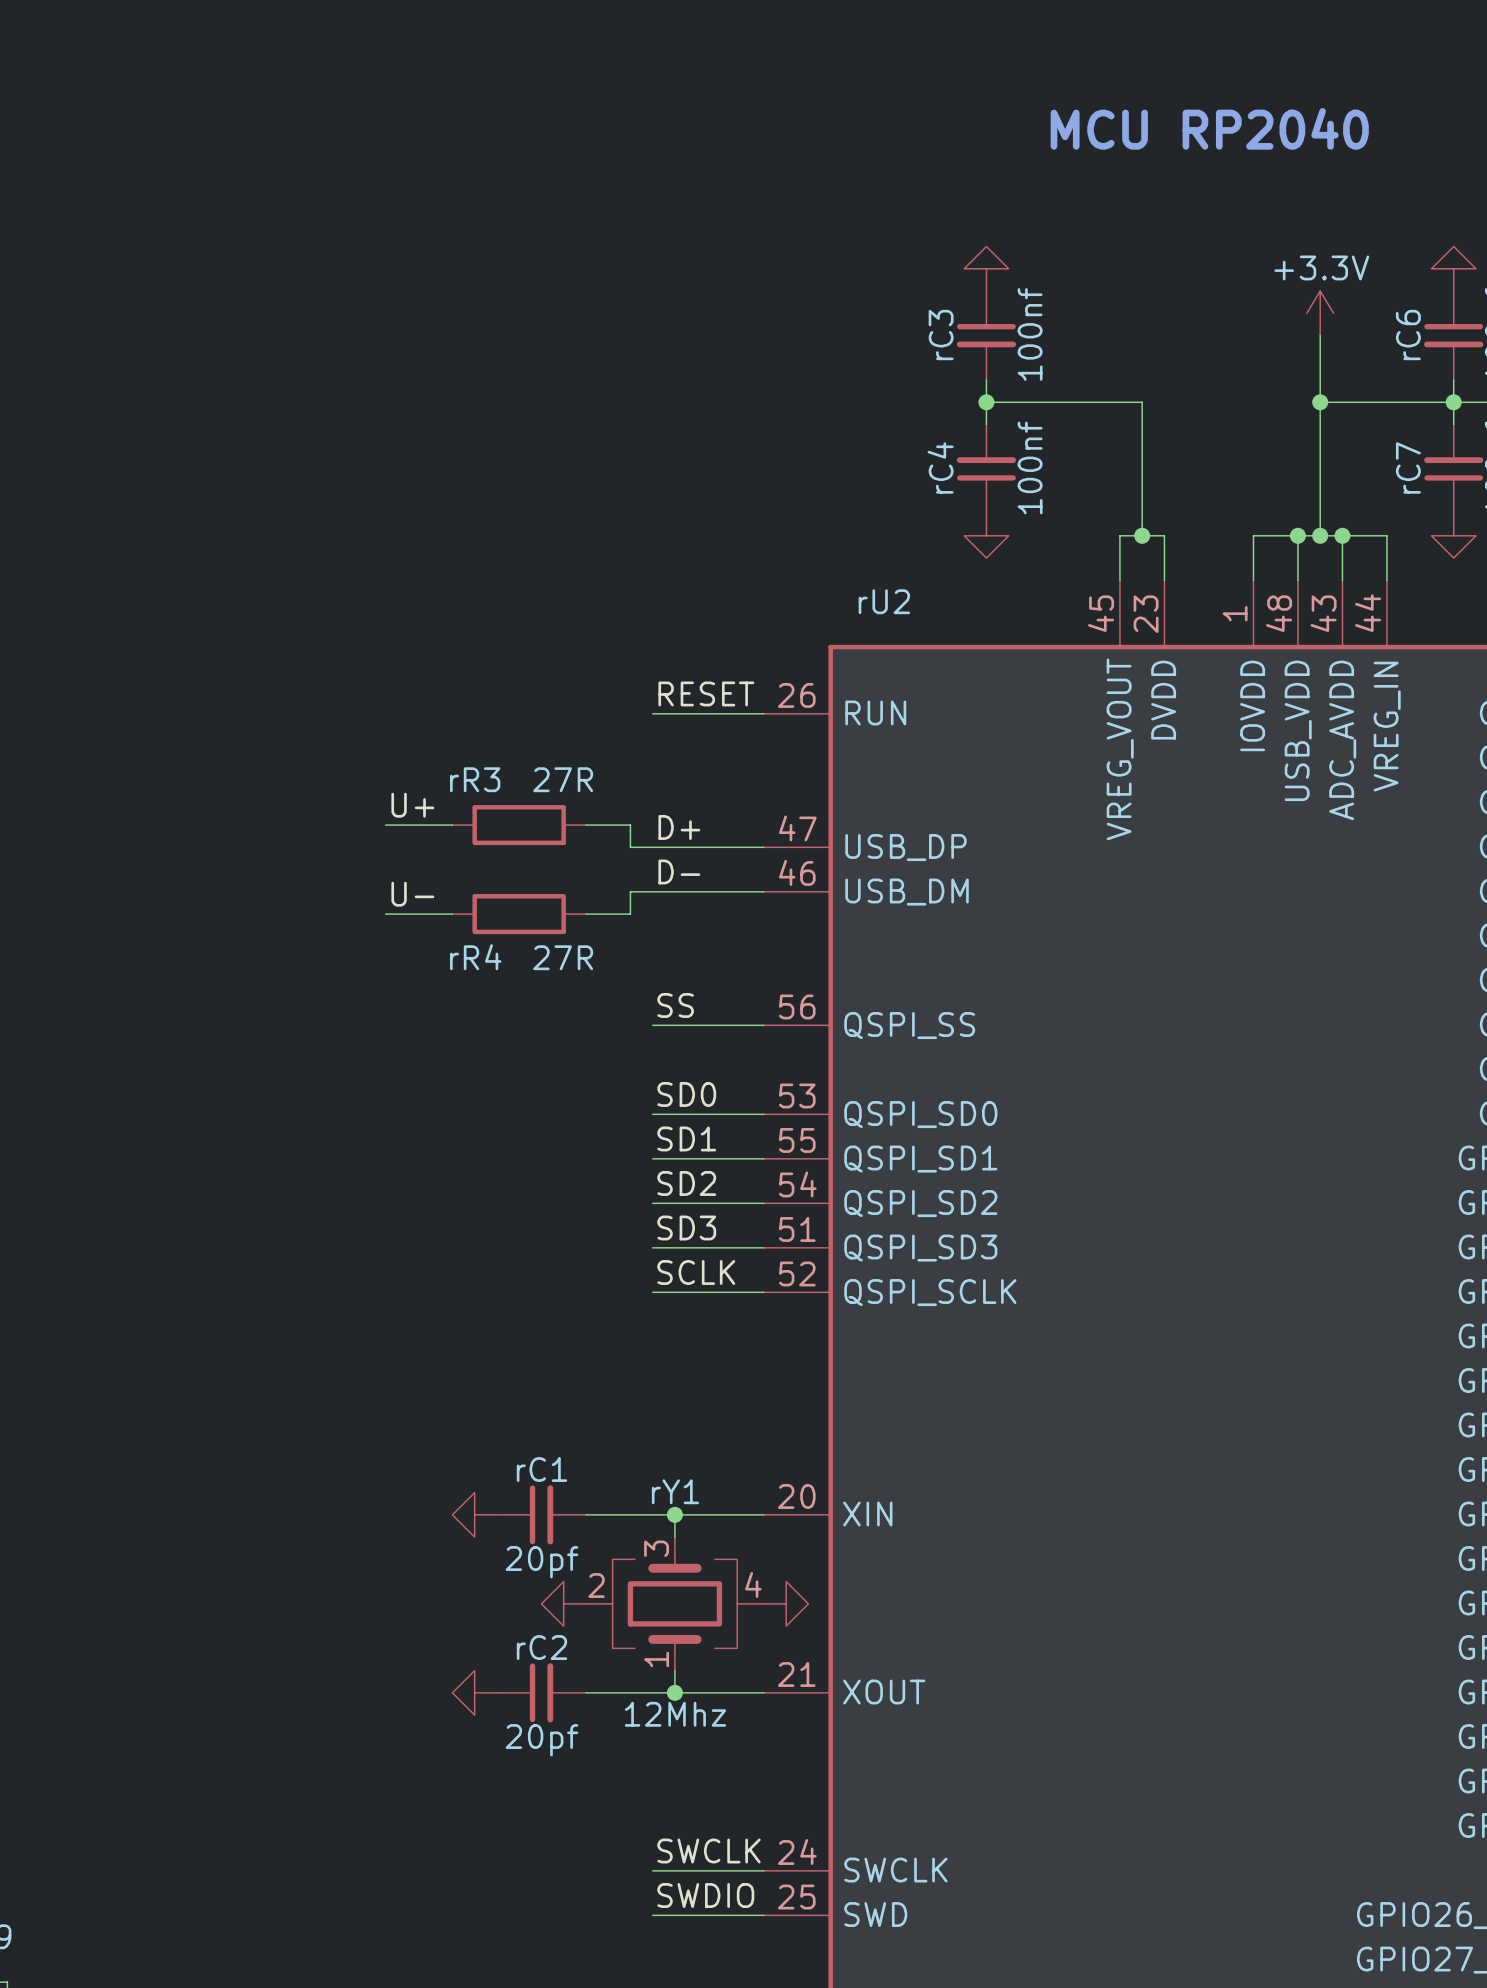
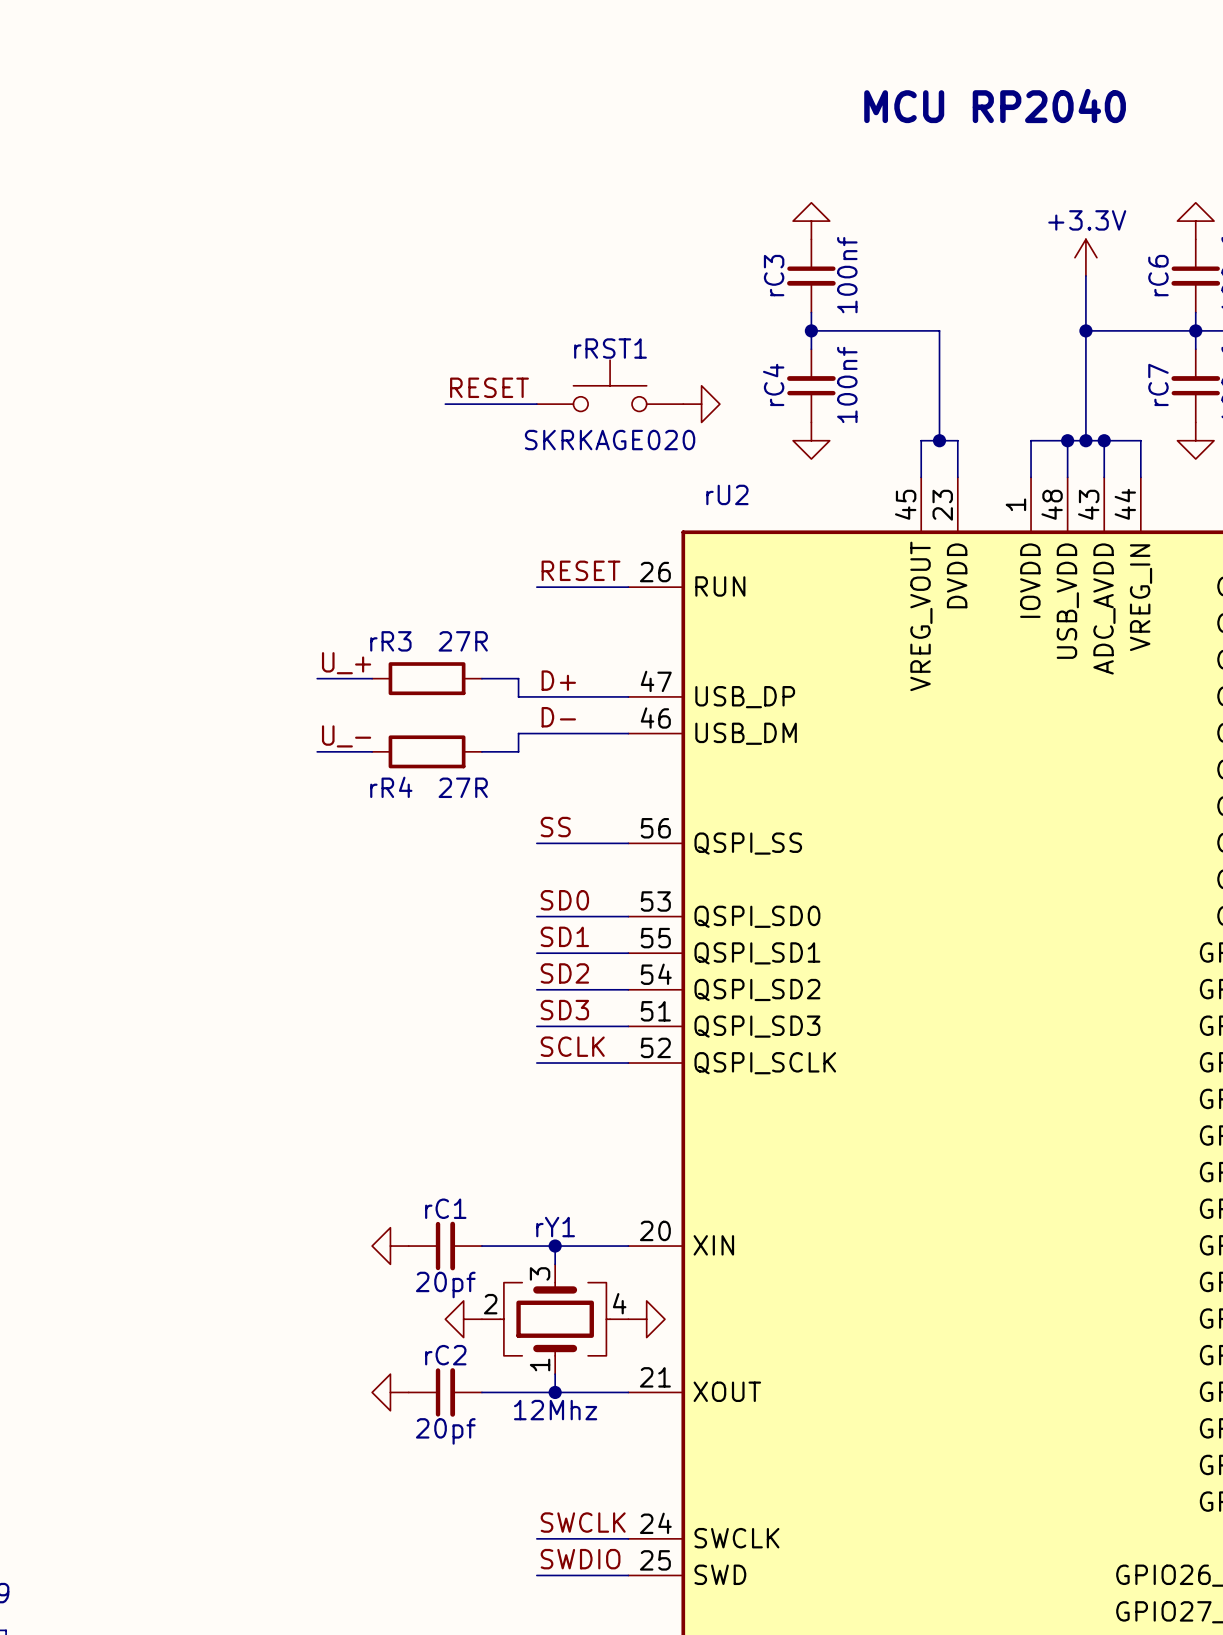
rRST1: none -> SKRKAGE020 (610, 385)
label: none -> RESET (489, 387)
wire: none -> (445, 404) (536, 404)
power symbol: none -> (701, 404)
label: U+ (412, 805) -> U_+ (346, 663)
label: U- (412, 894) -> U_- (346, 736)

